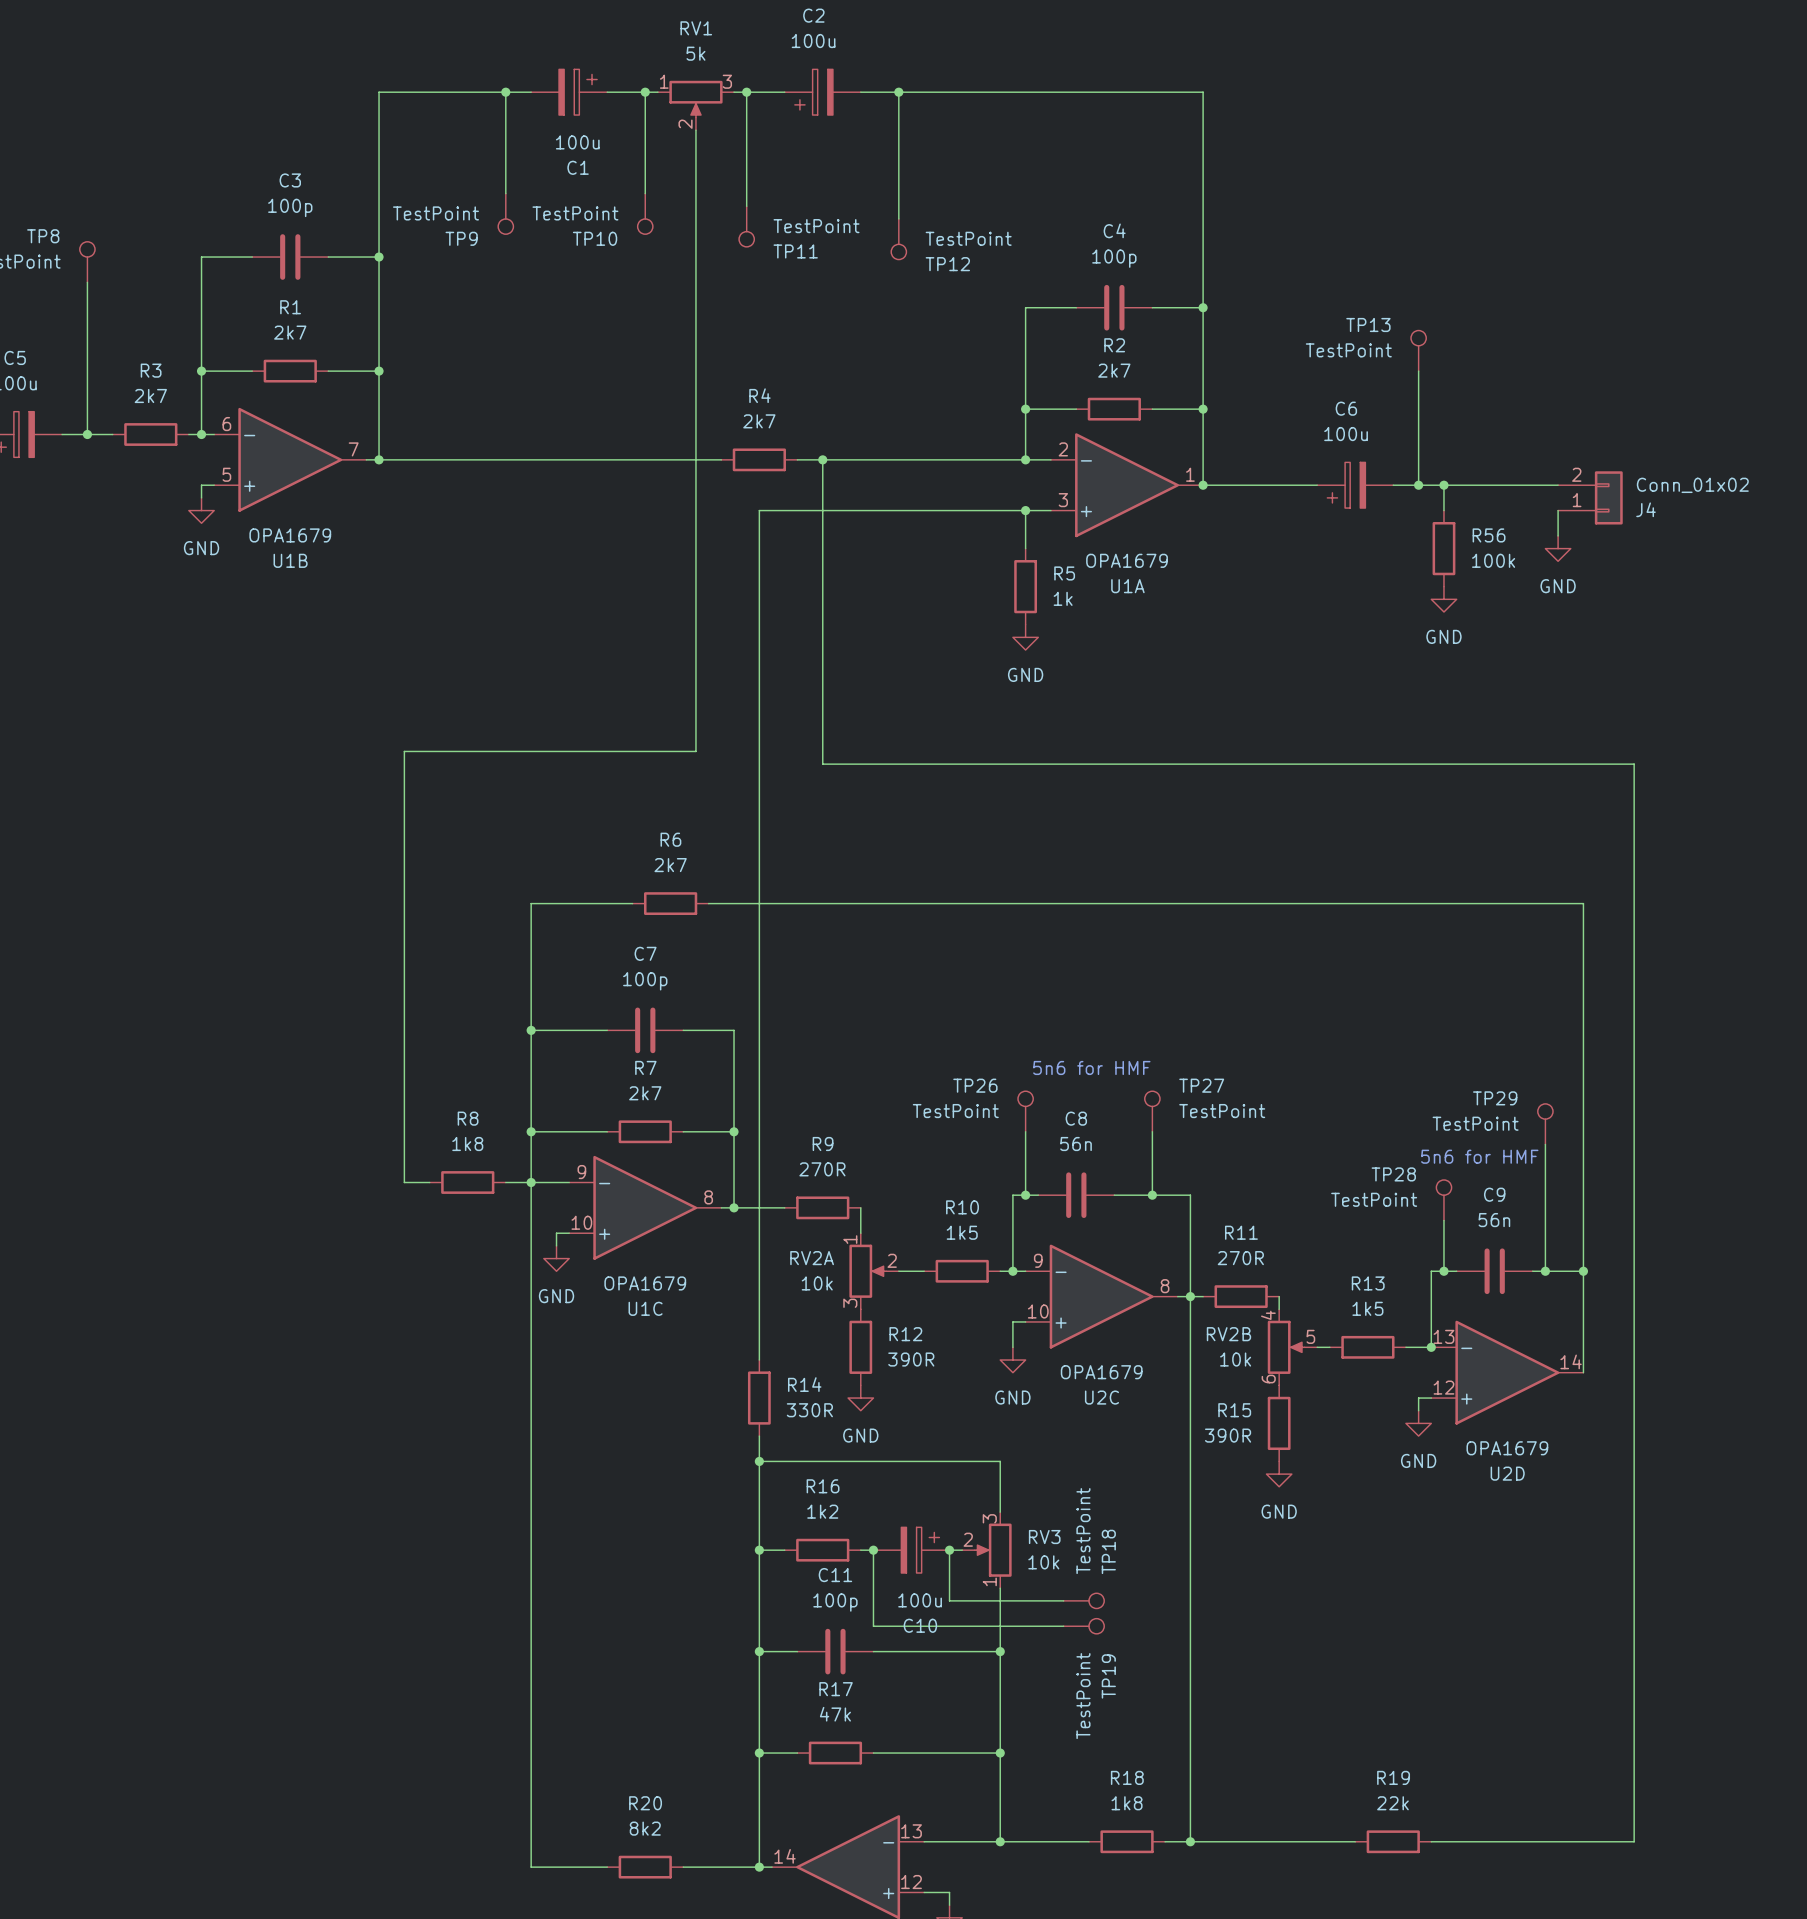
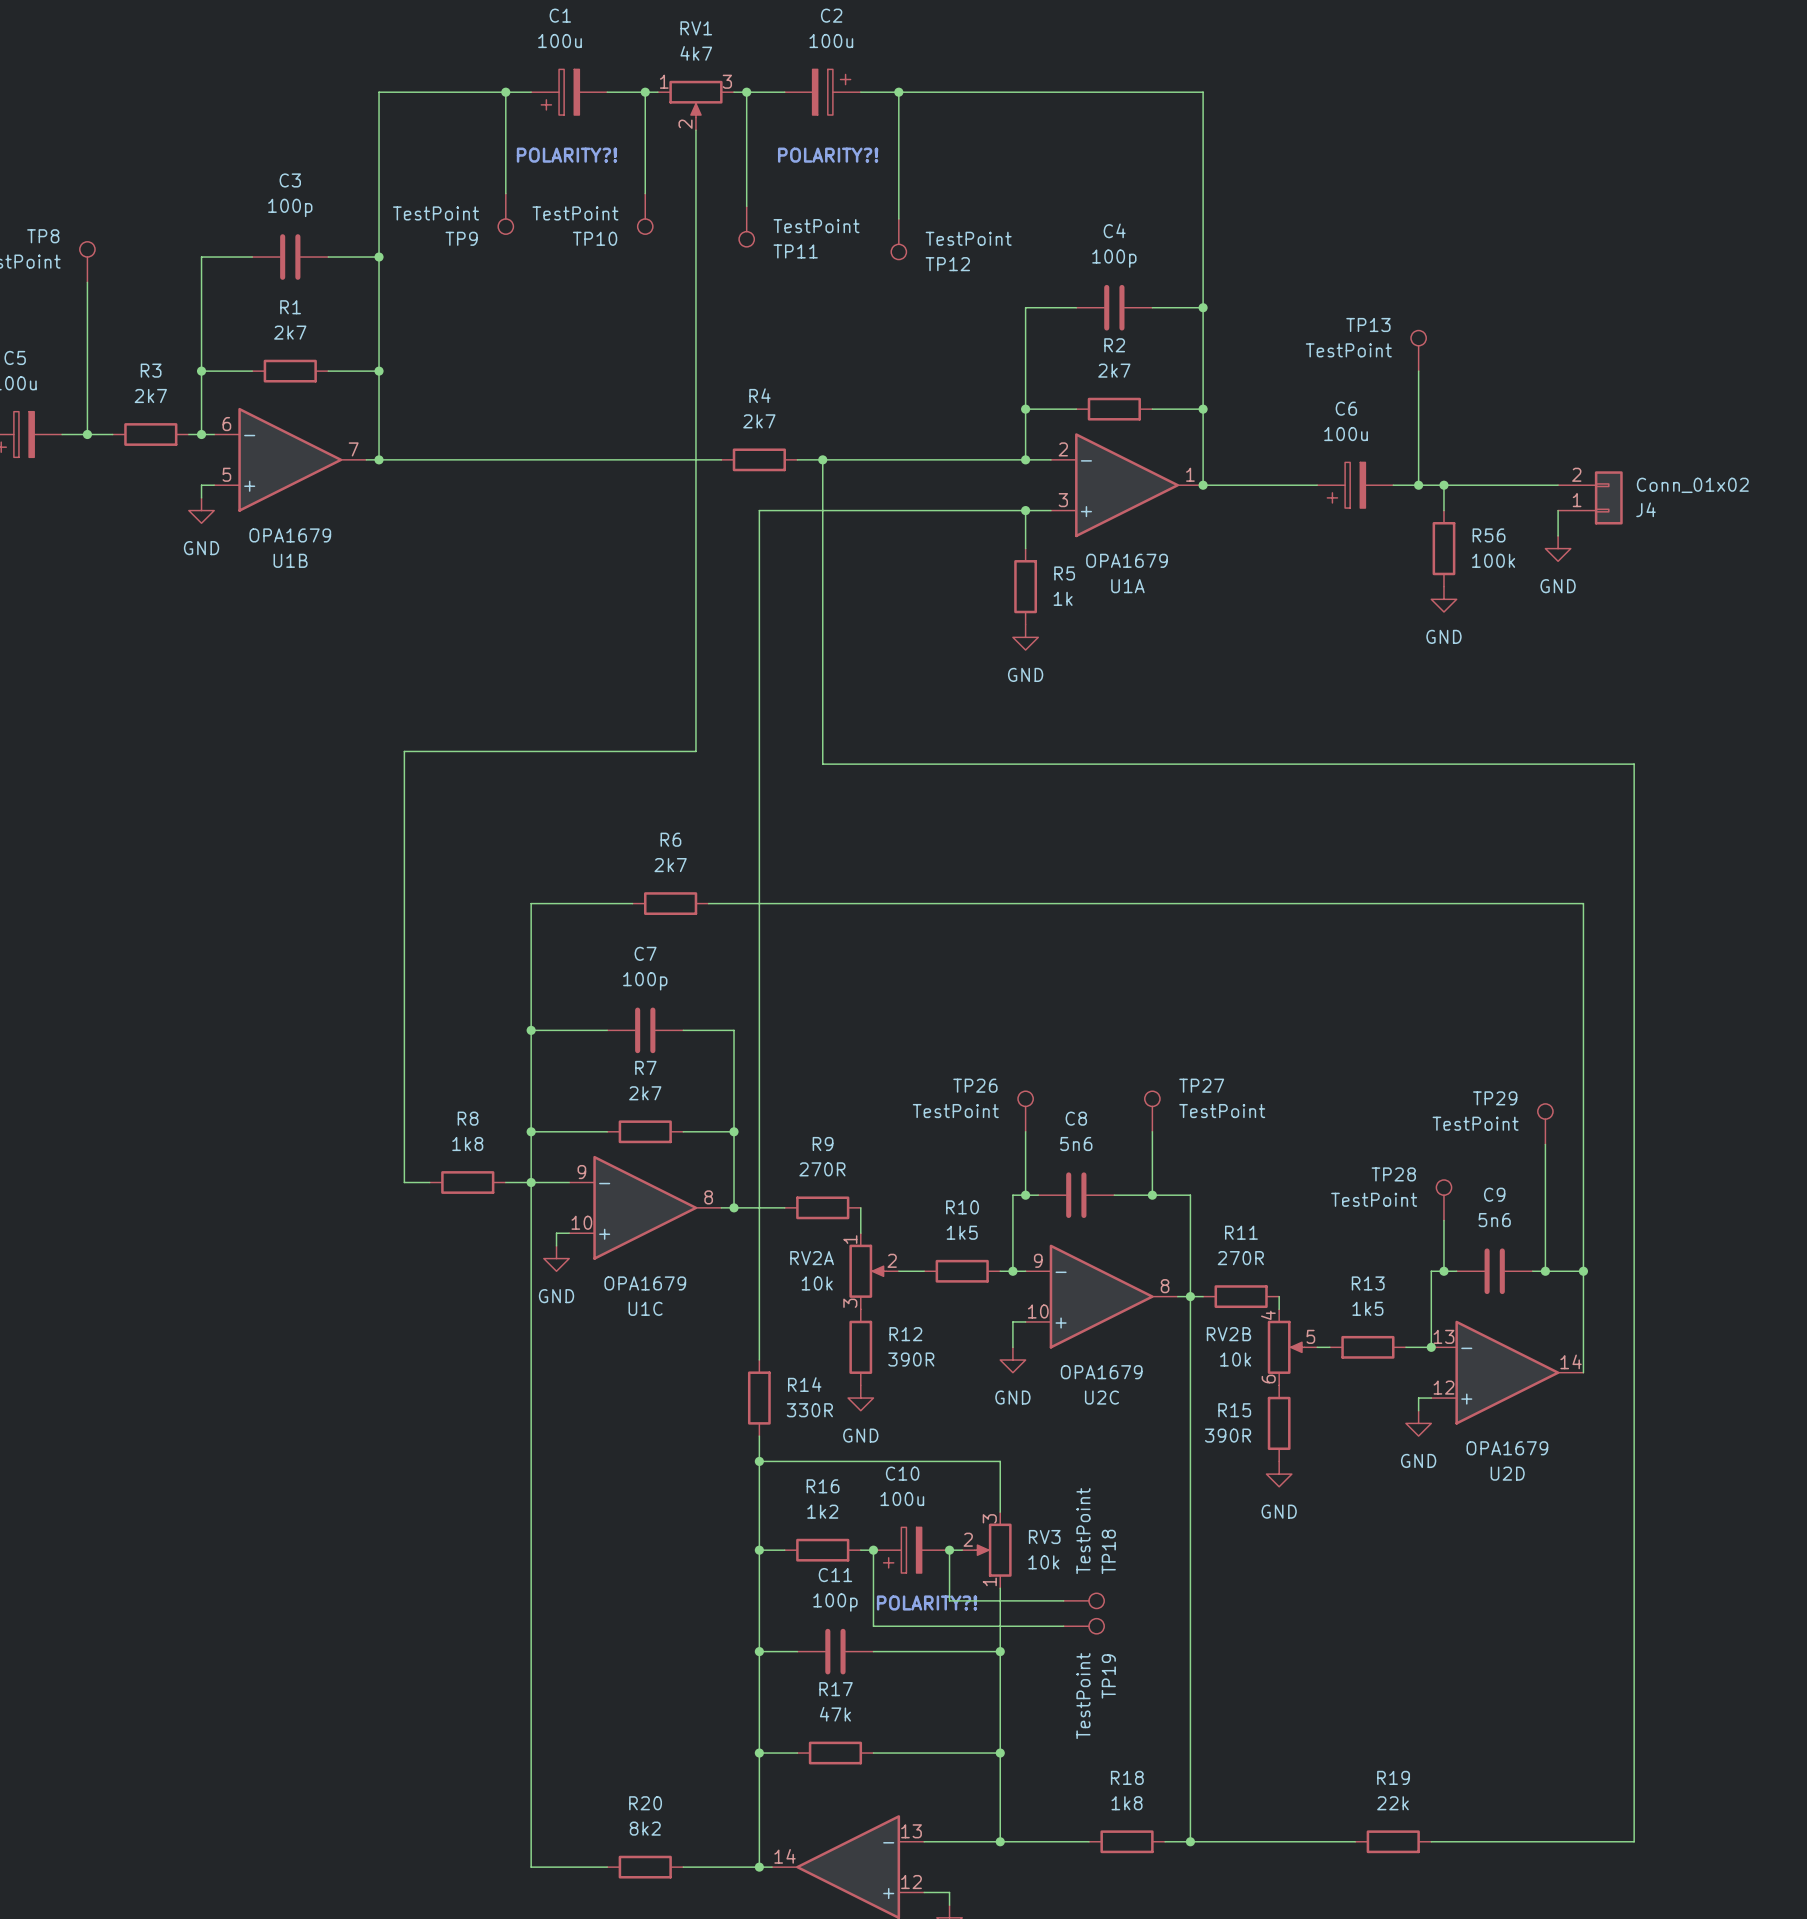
RV1 value: 5k (695, 53) -> 4k7 (696, 53)
C1 rotation: 0° (578, 92) -> 180° (560, 92)
C2 rotation: 0° (813, 92) -> 180° (831, 92)
text: none -> POLARITY?! (566, 155)
text: none -> POLARITY?! (828, 155)
text: 5n6 for HMF (1091, 1067) -> none
C8 value: 56n (1076, 1144) -> 5n6 (1076, 1144)
text: 5n6 for HMF (1479, 1156) -> none
C9 value: 56n (1494, 1220) -> 5n6 (1494, 1220)
C10 rotation: 0° (920, 1550) -> 180° (902, 1550)
text: none -> POLARITY?! (927, 1602)

